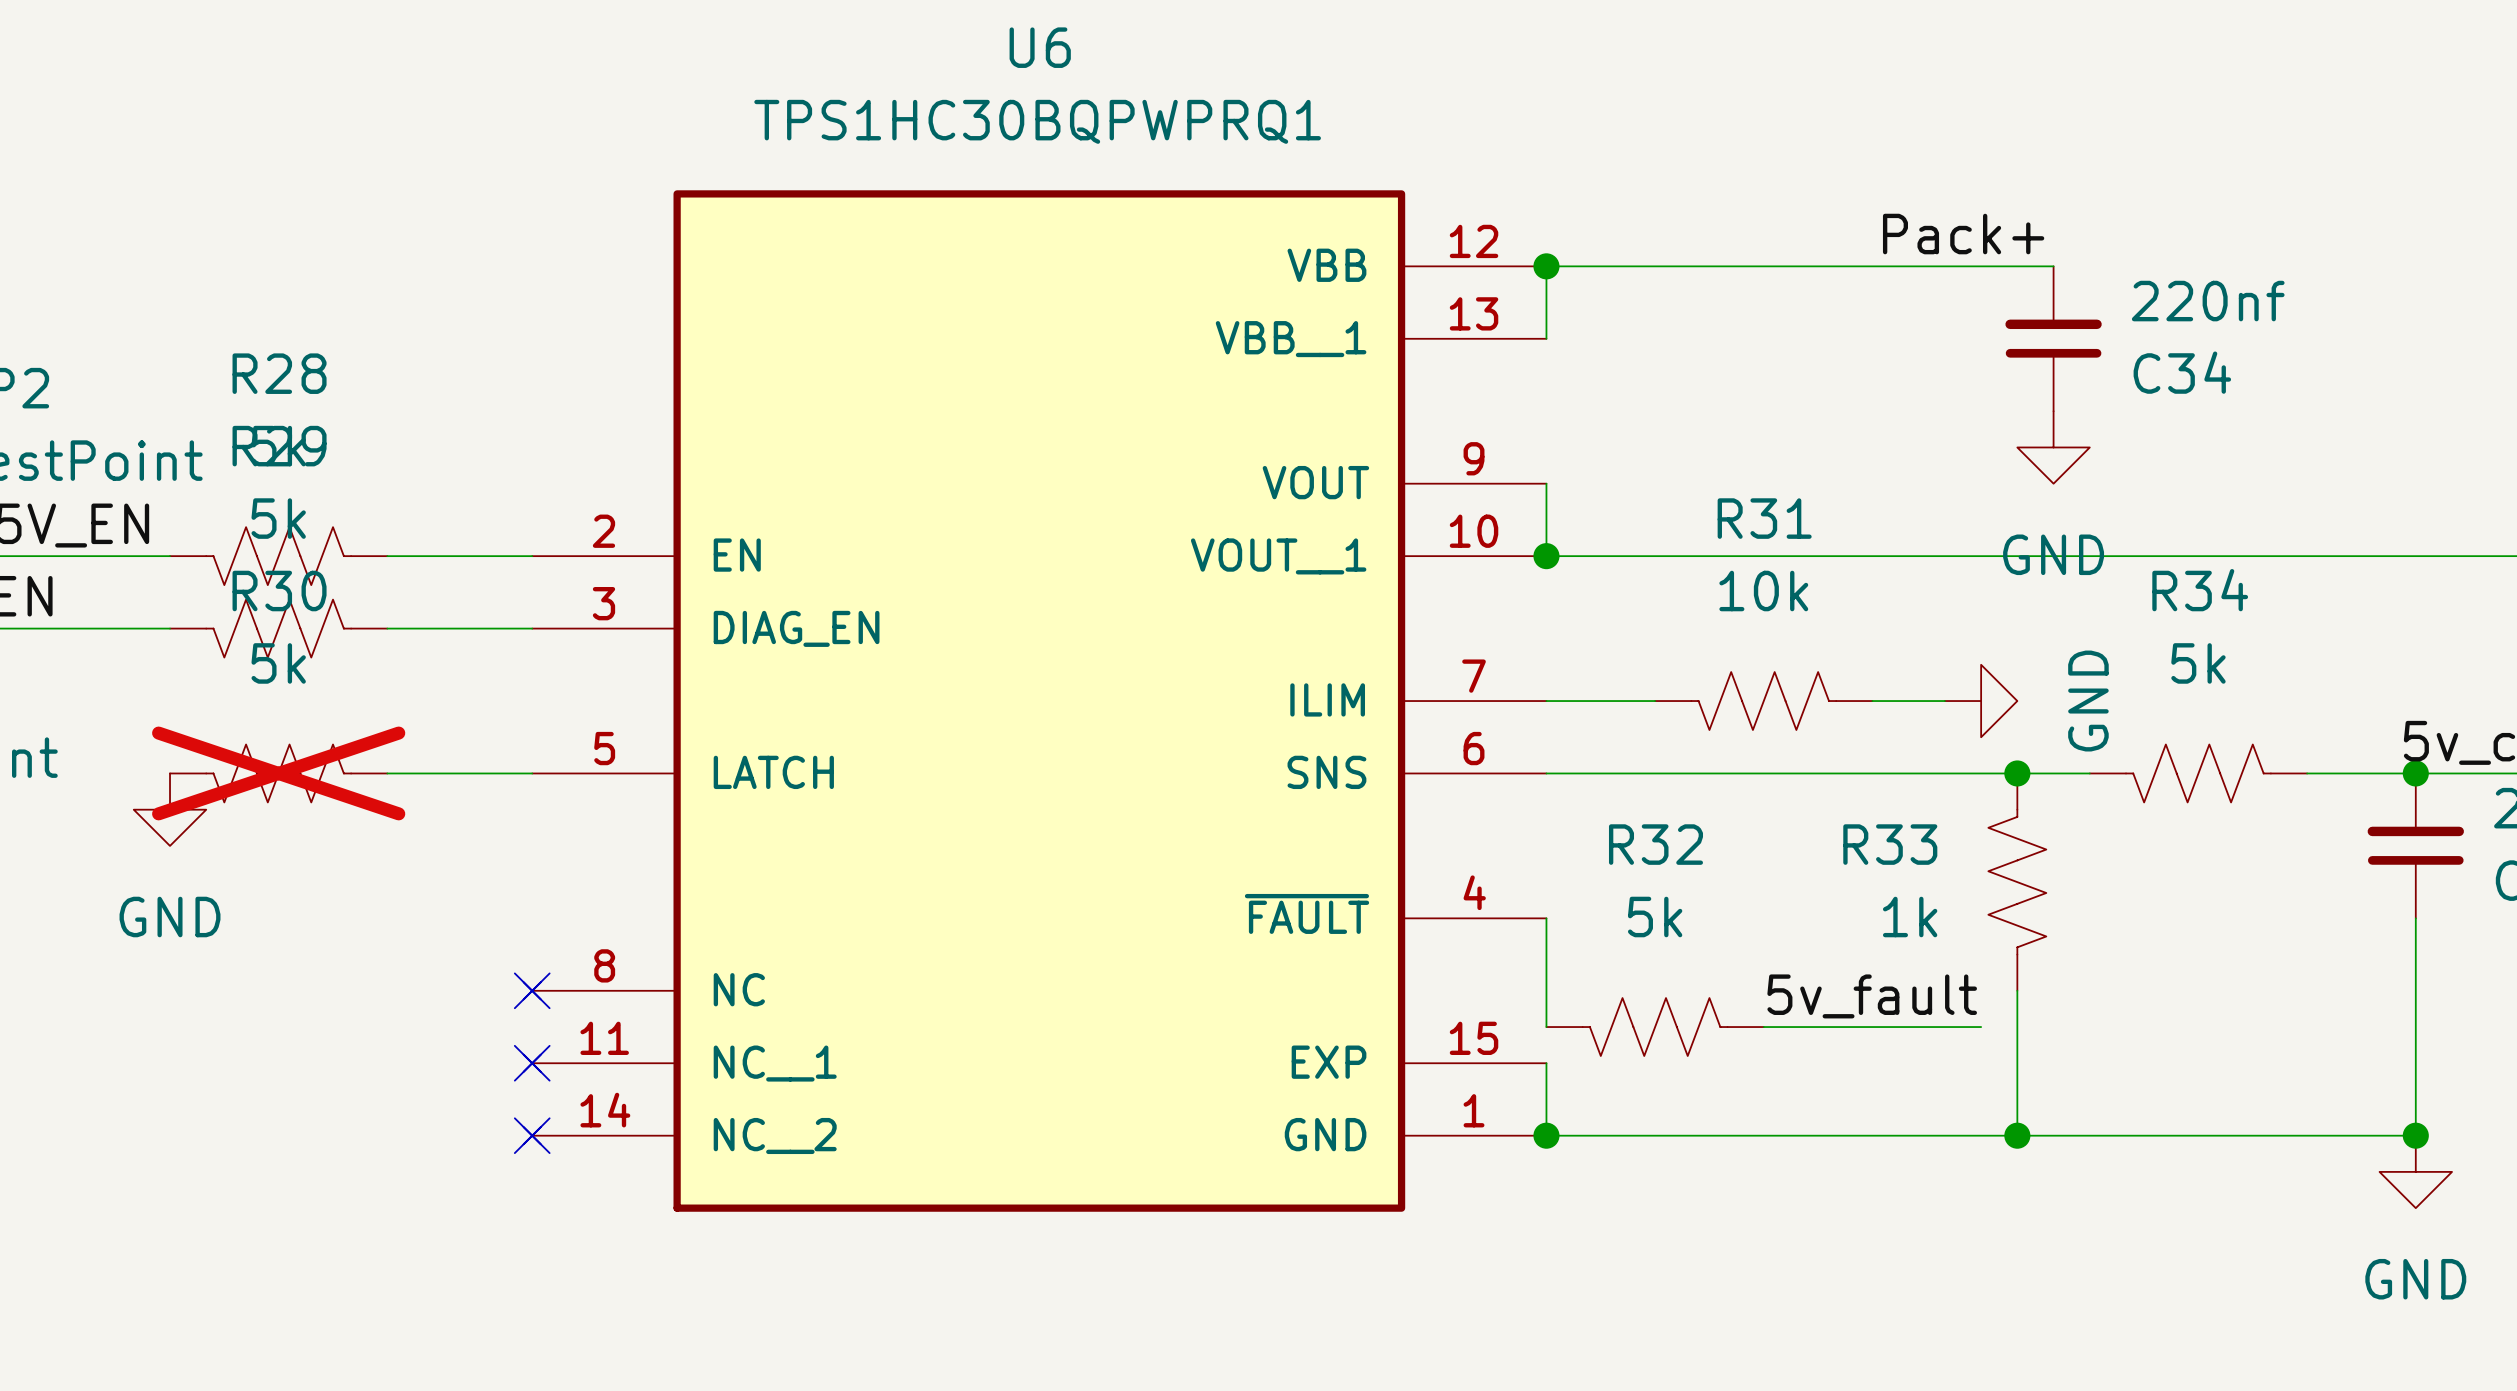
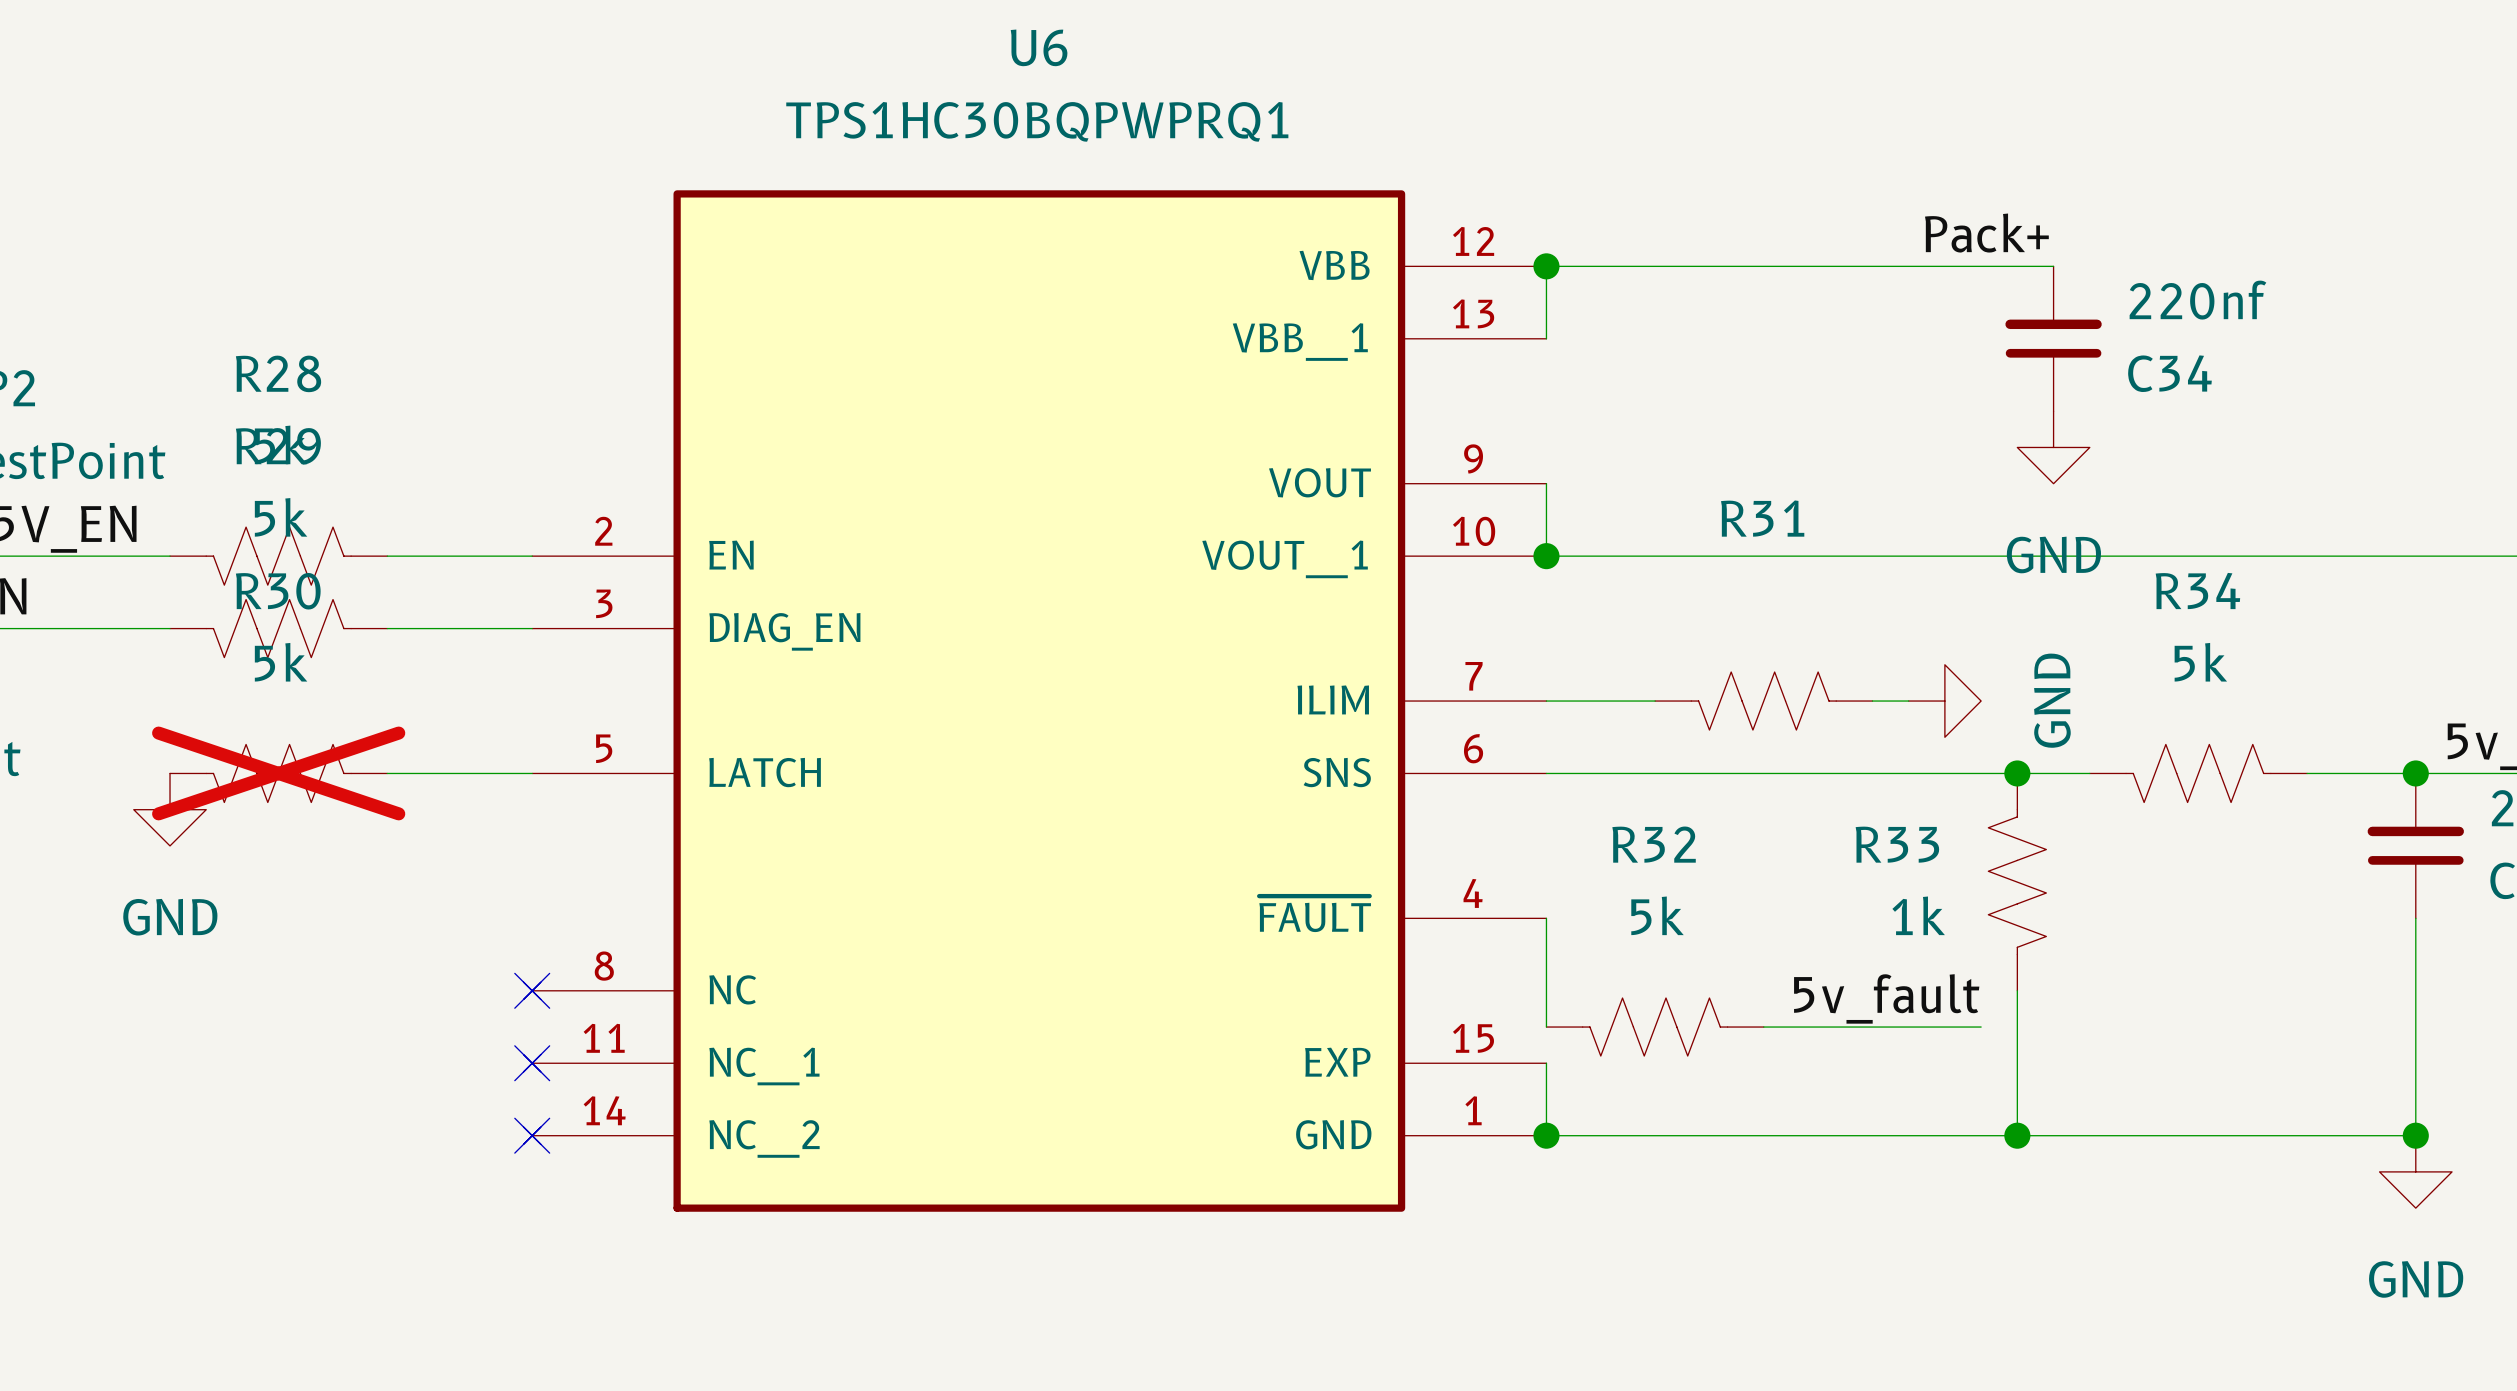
R31 value: 10k (1763, 591) -> none
power symbol position: GND (1981, 701) -> GND (1944, 701)

